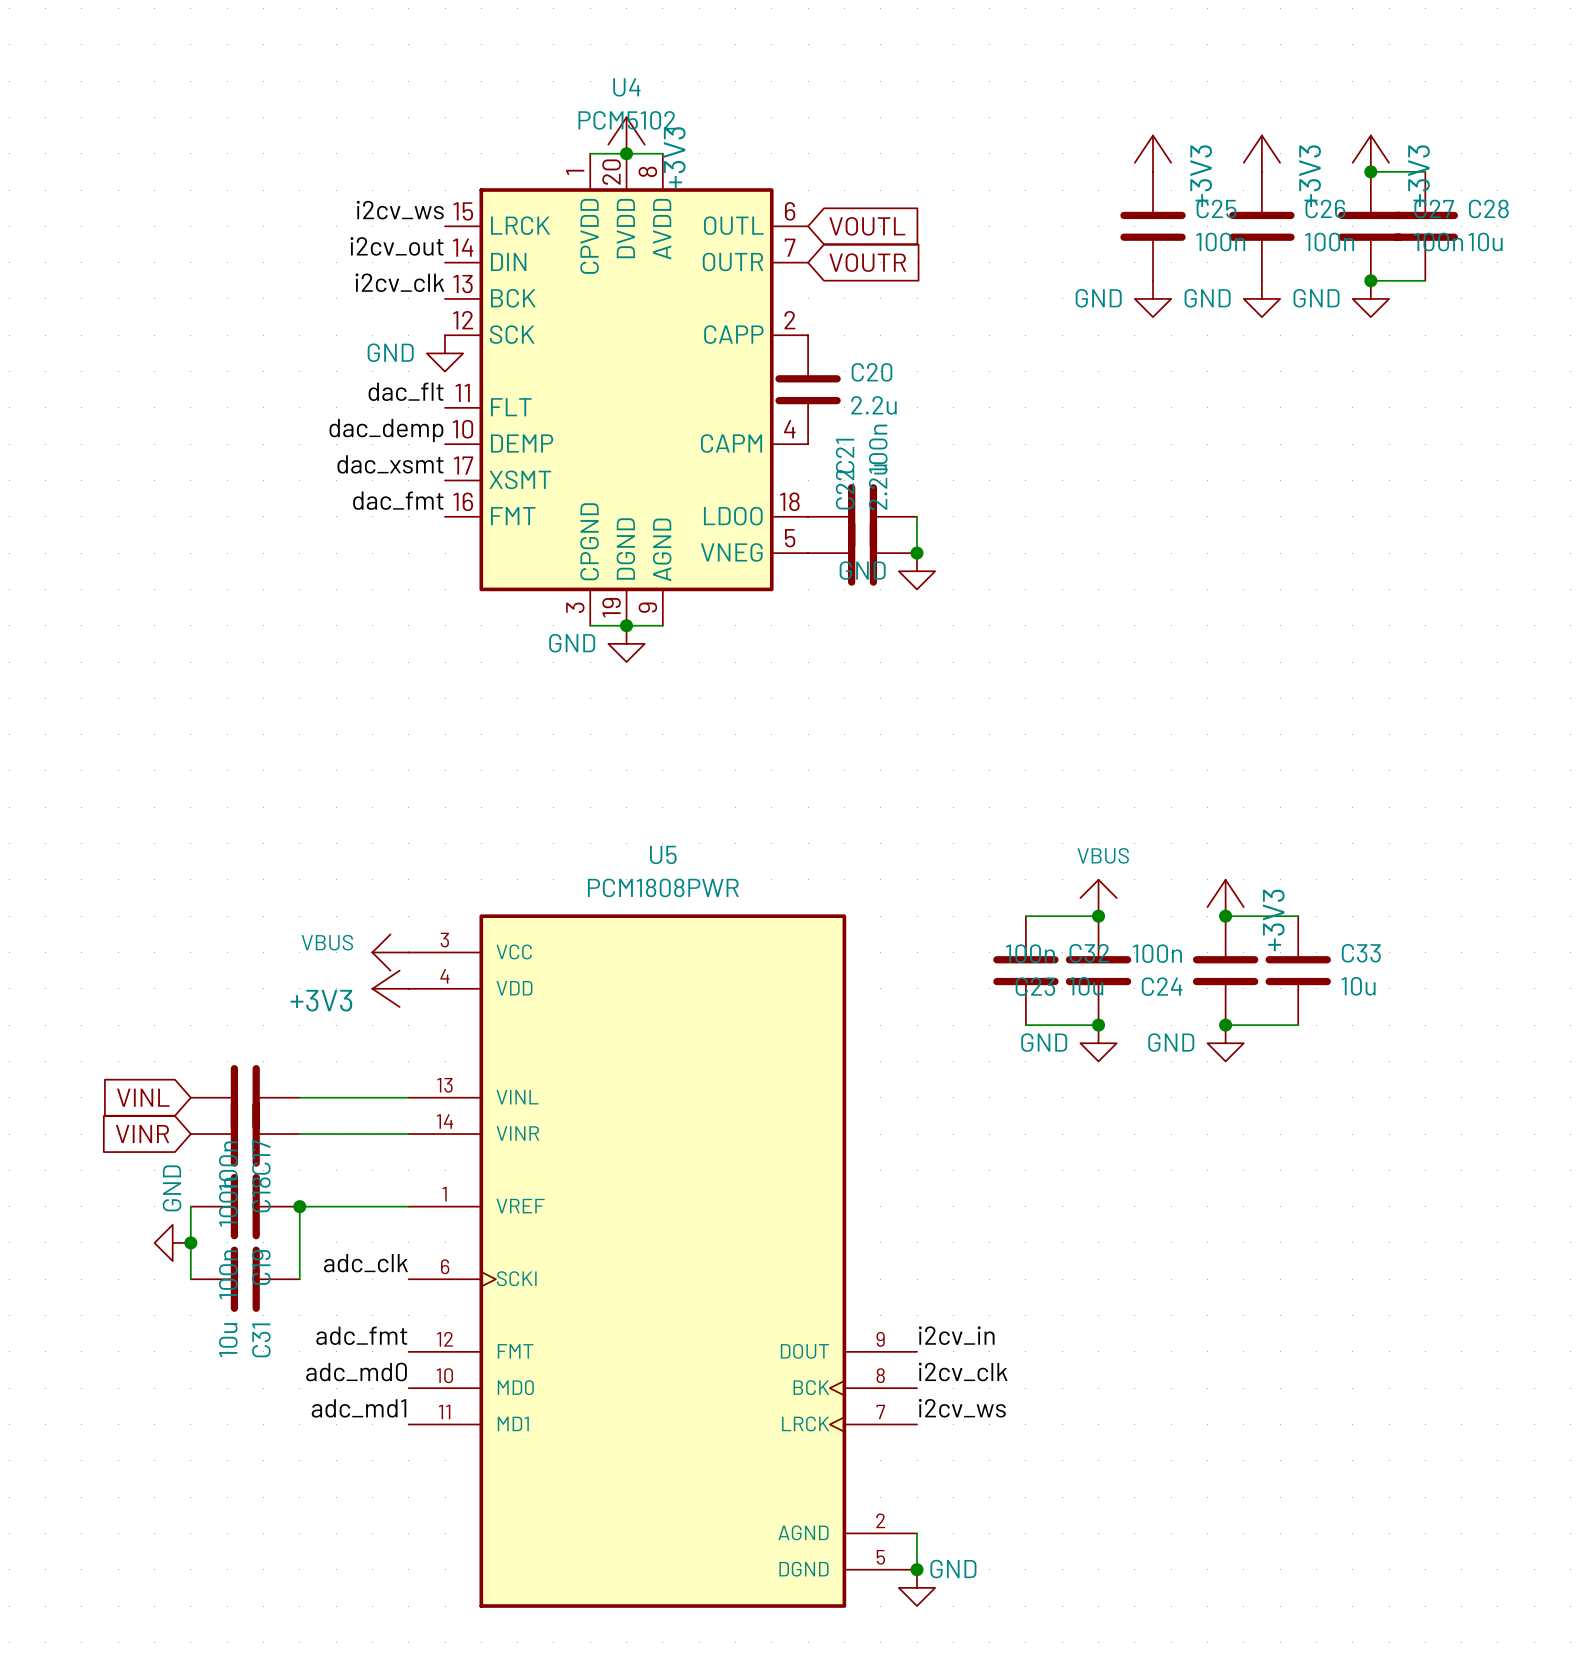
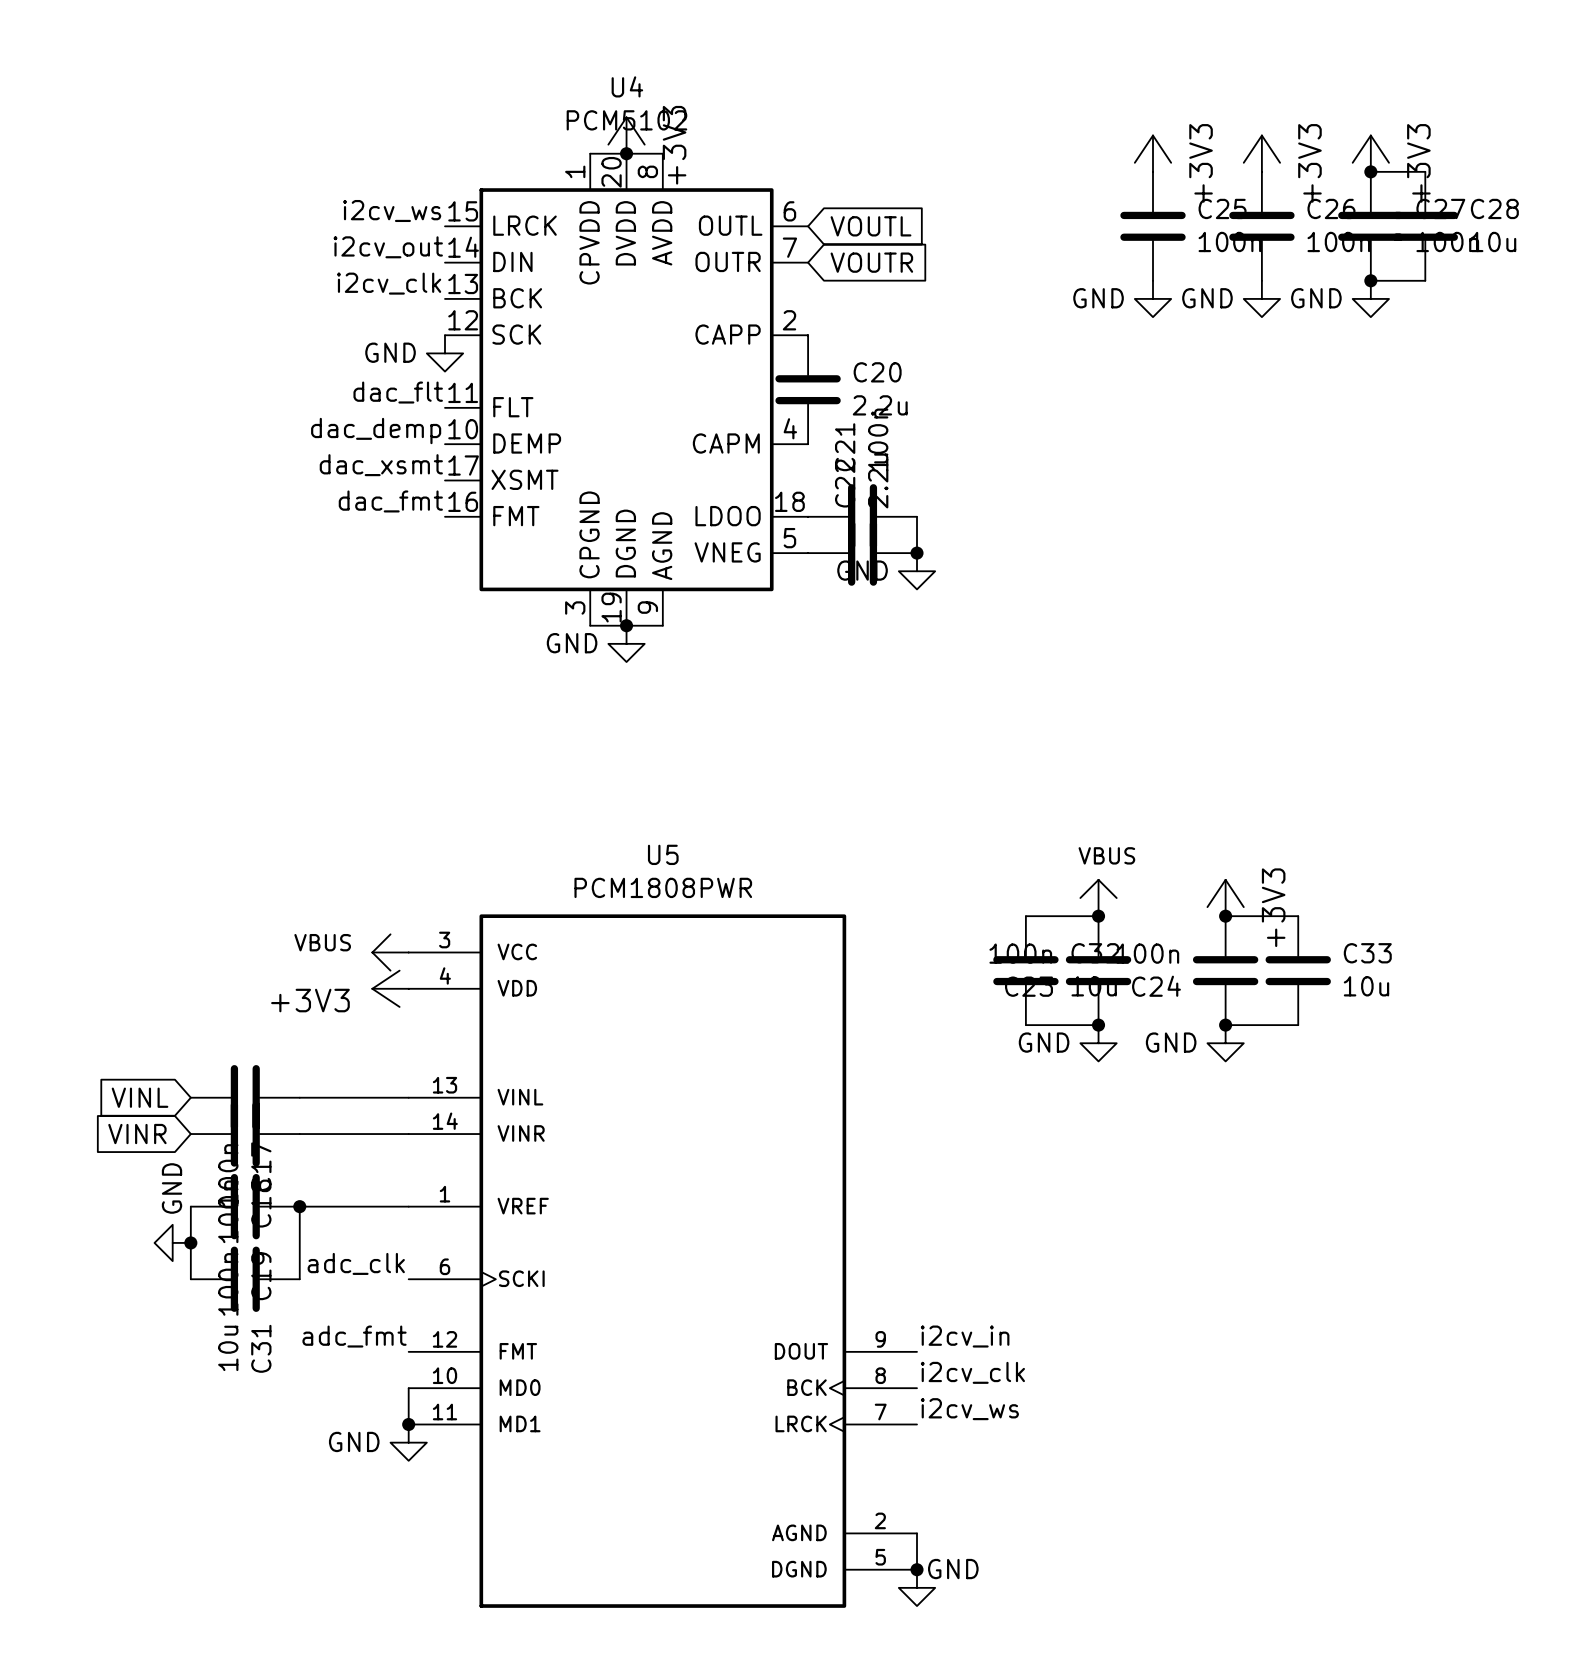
label: adc_md0 (356, 1371) -> none
wire: none -> (408, 1388) (408, 1424)
label: adc_md1 (359, 1408) -> none
junction: none -> (408, 1424)
power symbol: none -> GND (408, 1442)

